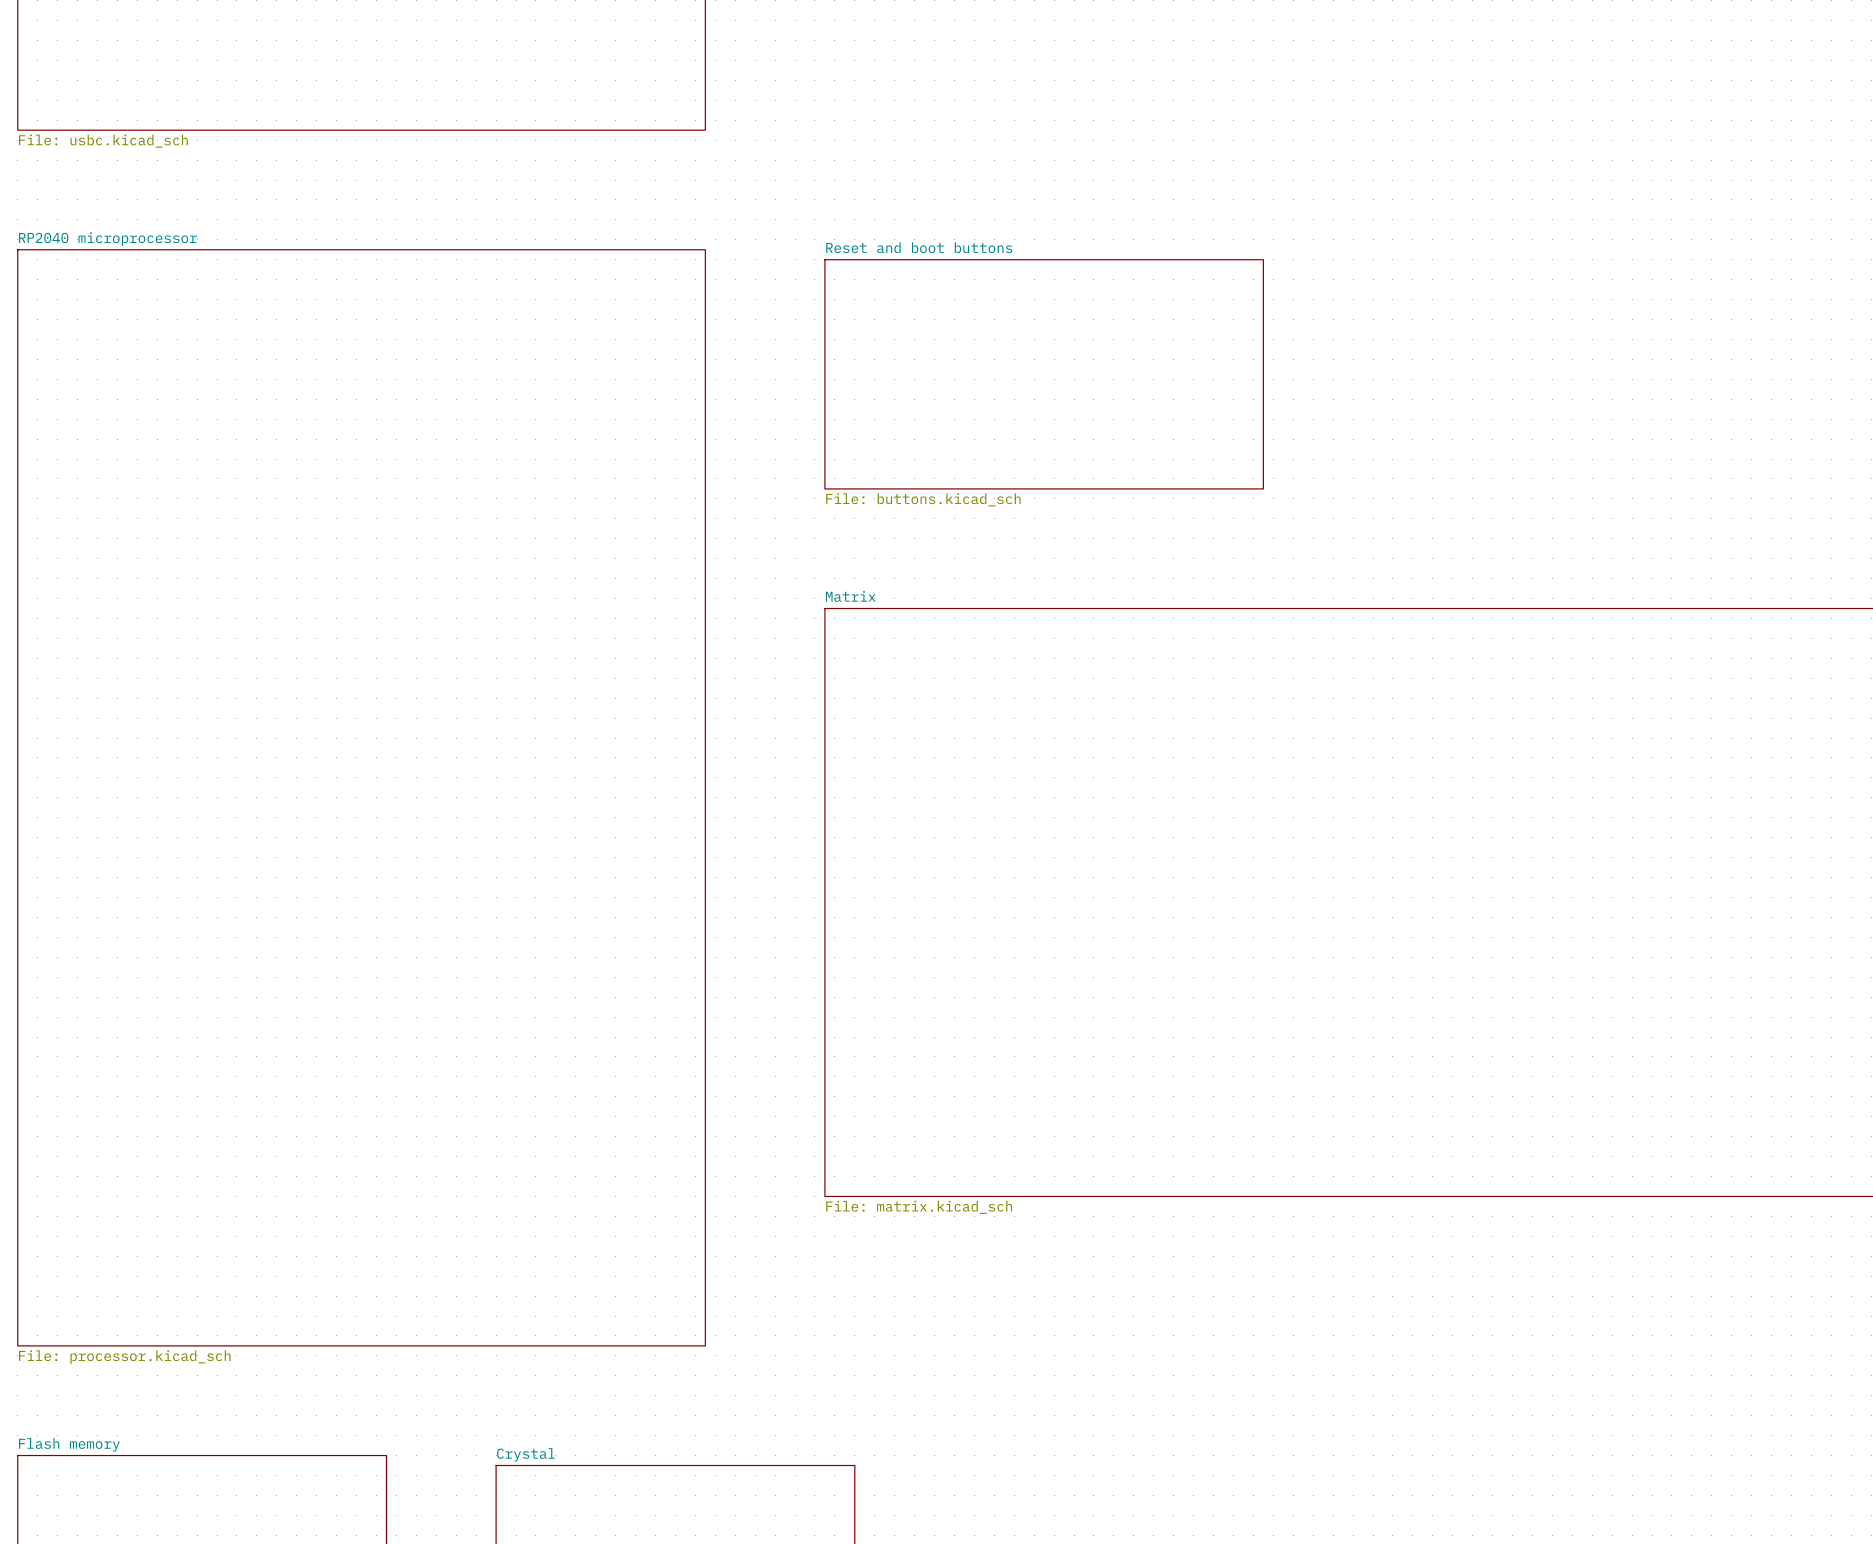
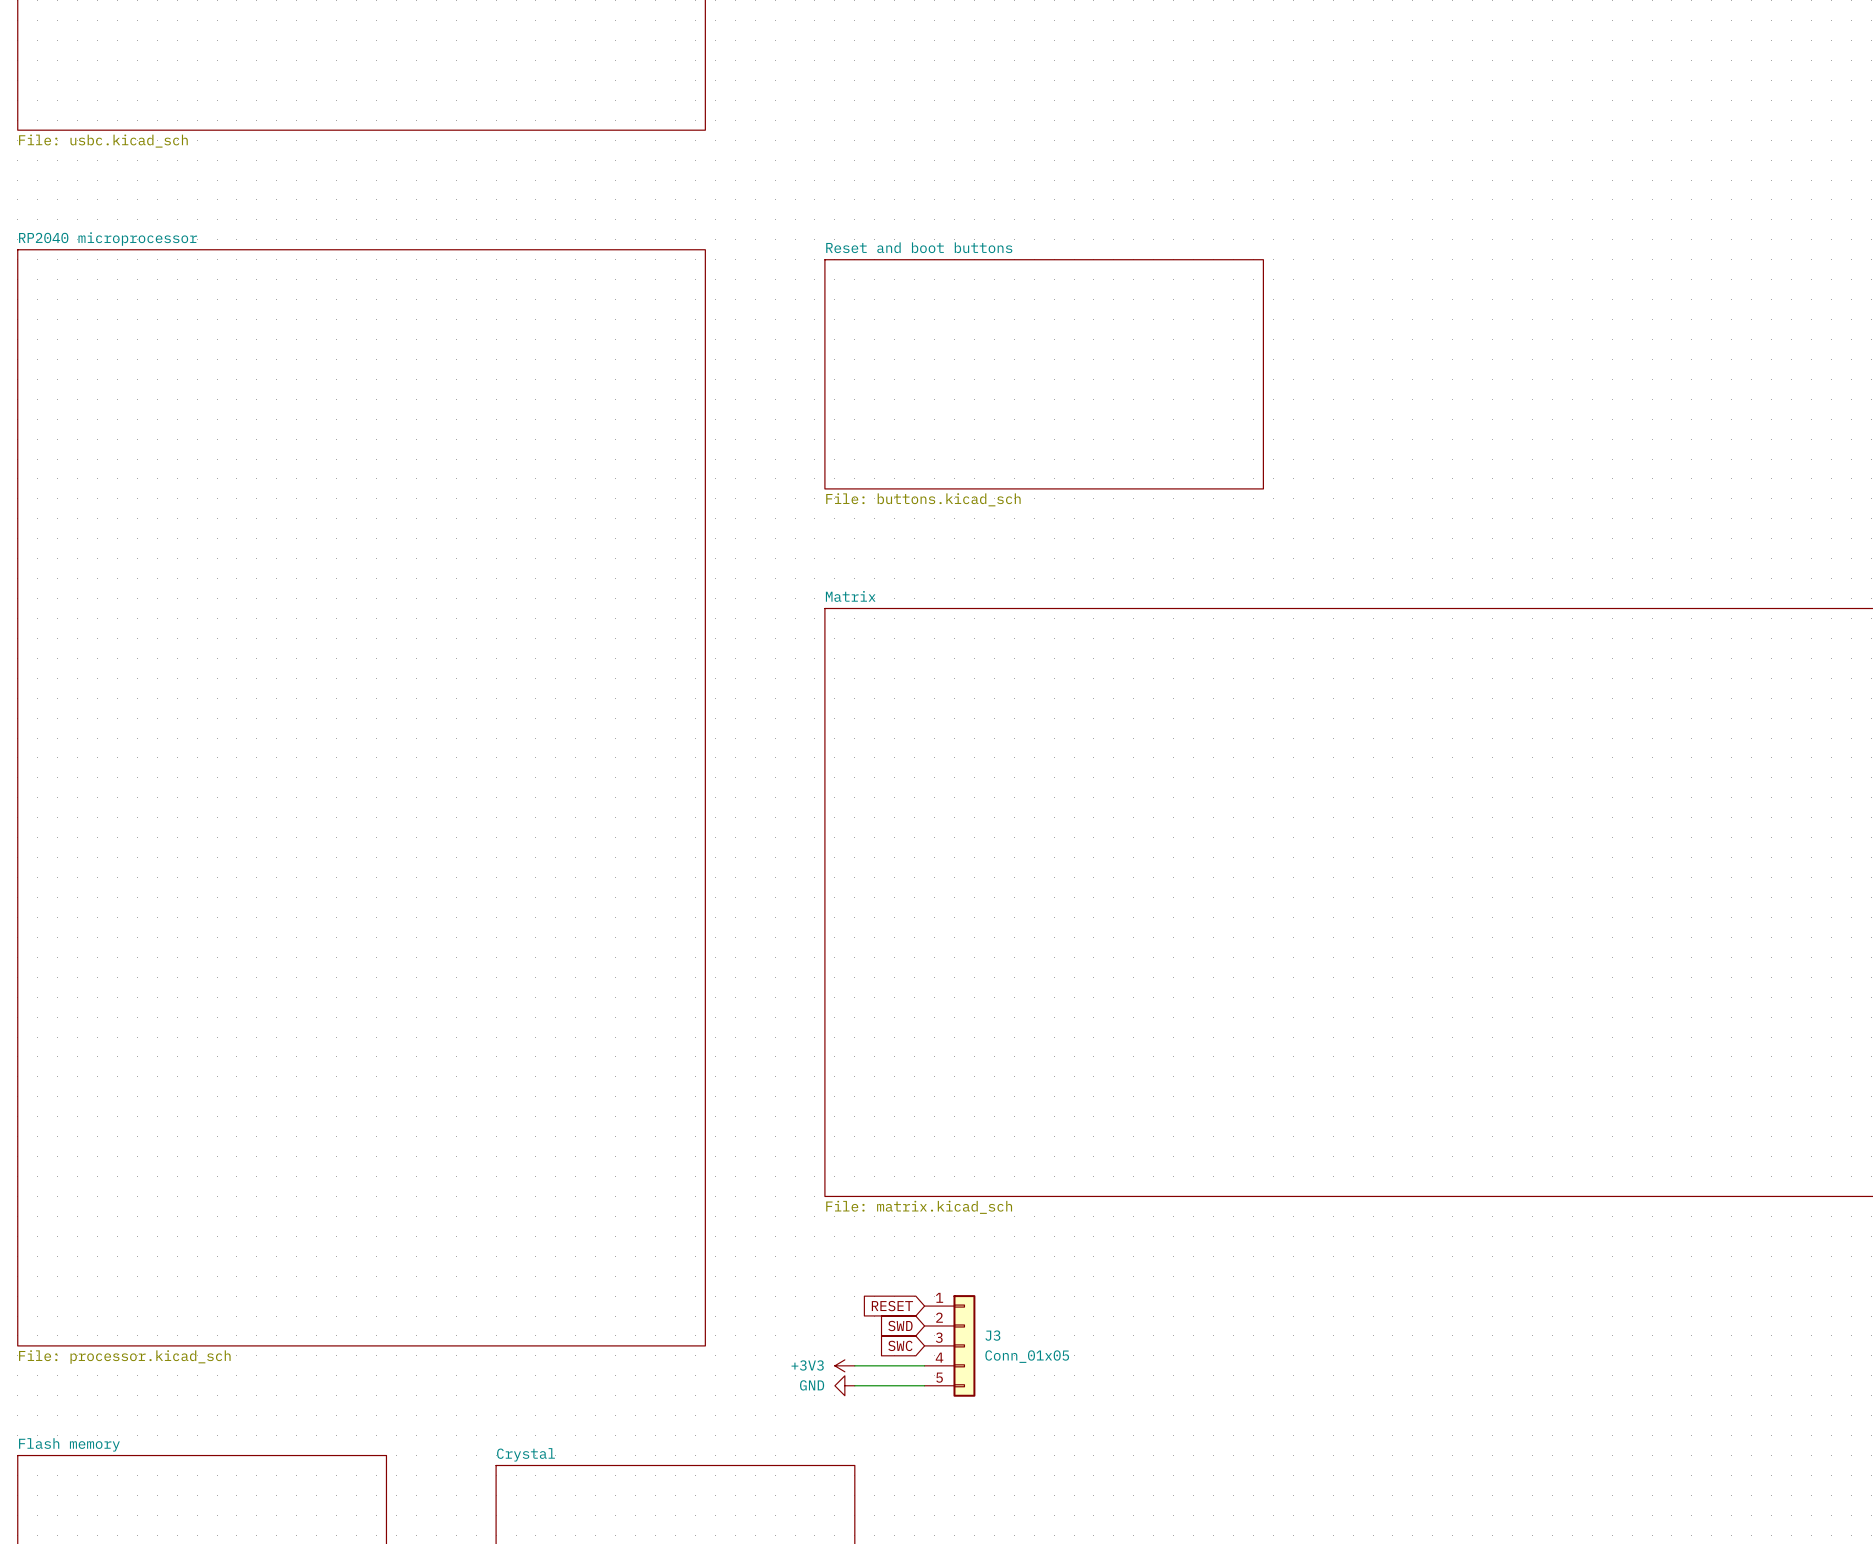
global label: none -> RESET (892, 1306)
global label: none -> SWD (900, 1325)
global label: none -> SWC (900, 1345)
J3: none -> Conn_01x05 (949, 1345)
power symbol: none -> +3V3 (844, 1365)
wire: none -> (854, 1365) (924, 1365)
power symbol: none -> GND (844, 1385)
wire: none -> (854, 1385) (924, 1385)

